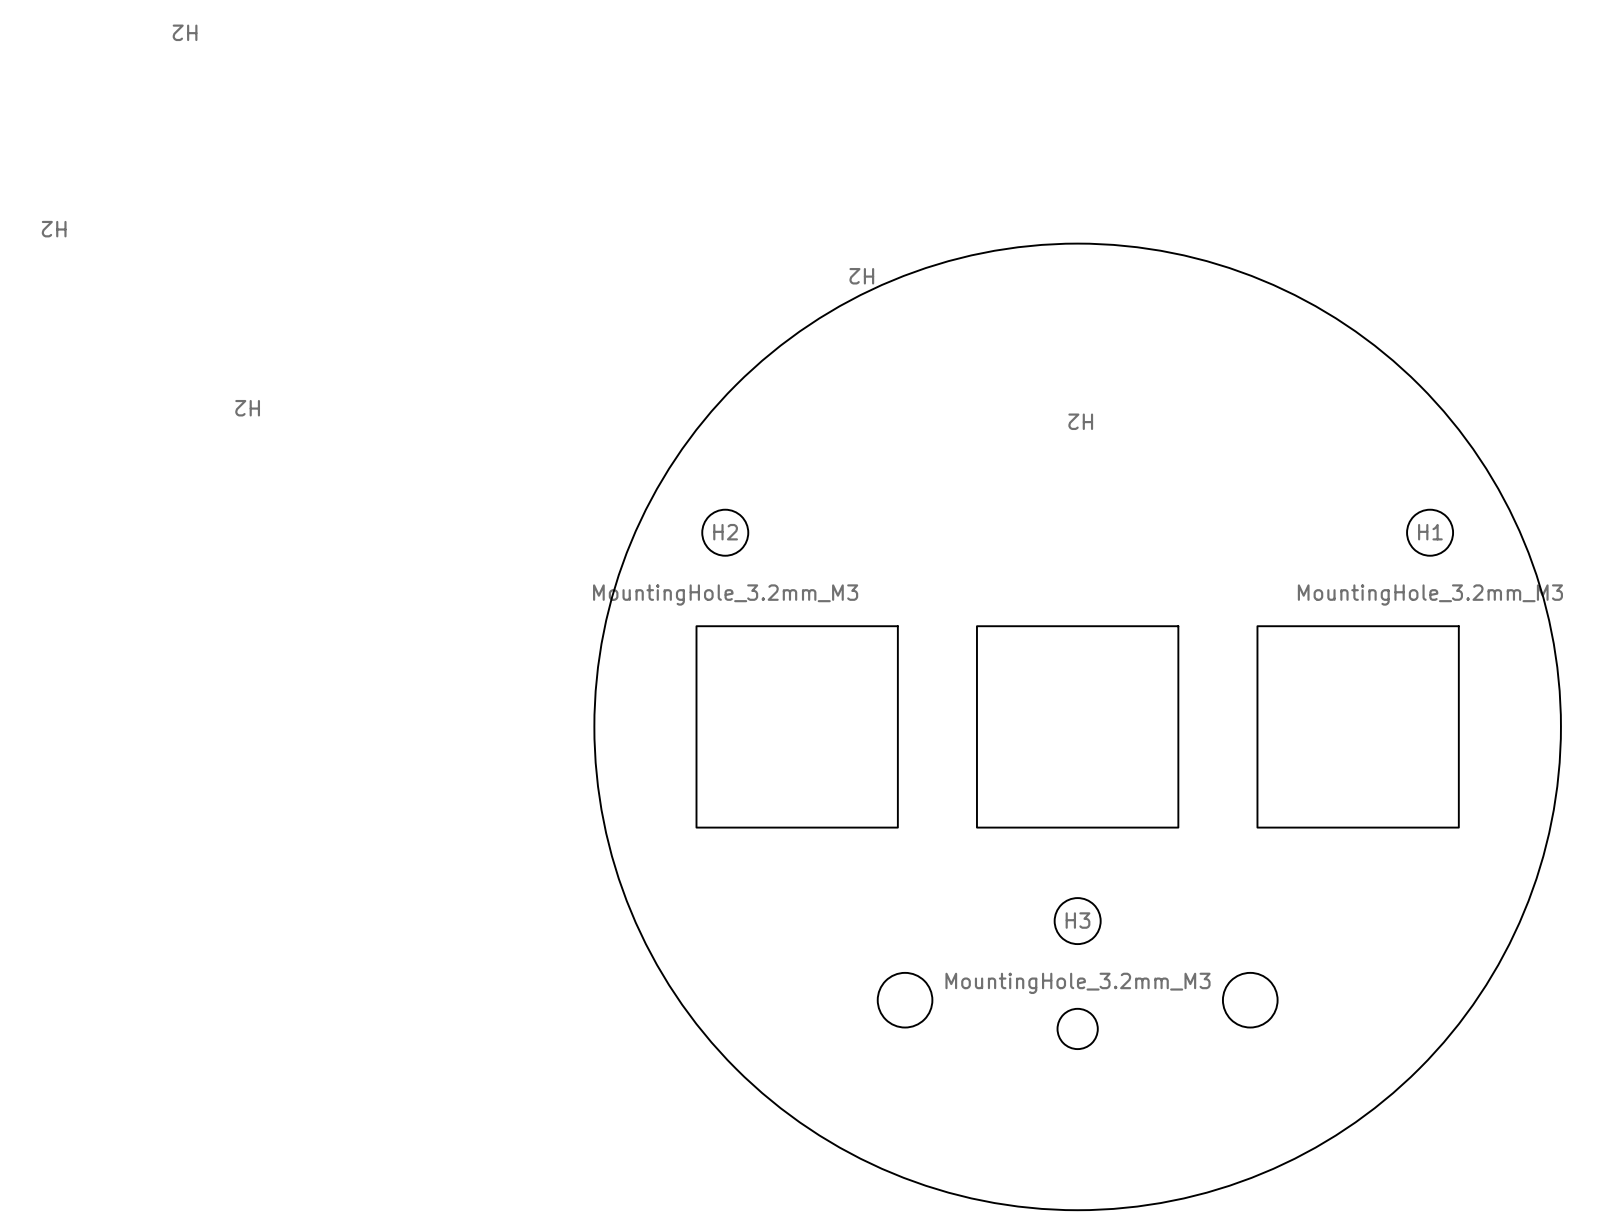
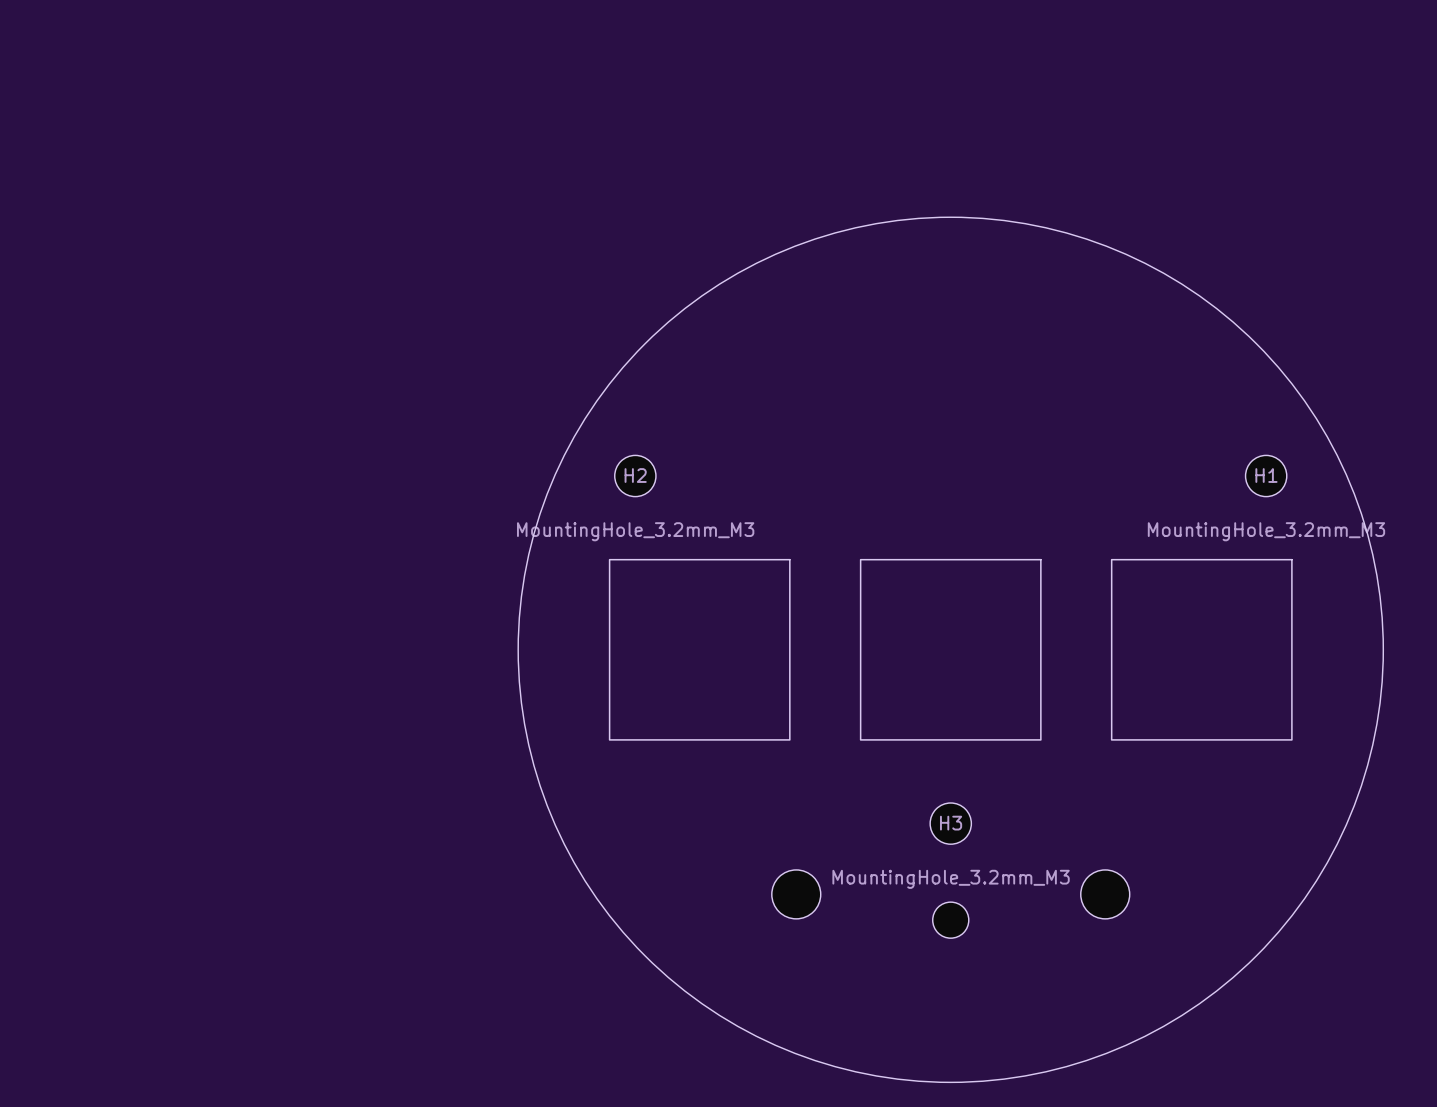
text: H2 (185, 32) -> none
text: H2 (54, 229) -> none
text: H2 (861, 276) -> none
text: H2 (247, 408) -> none
text: H2 (1080, 421) -> none

